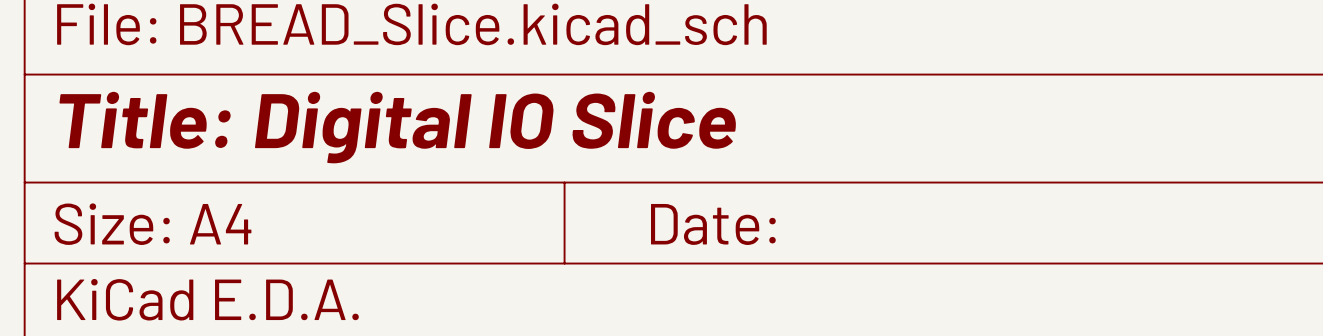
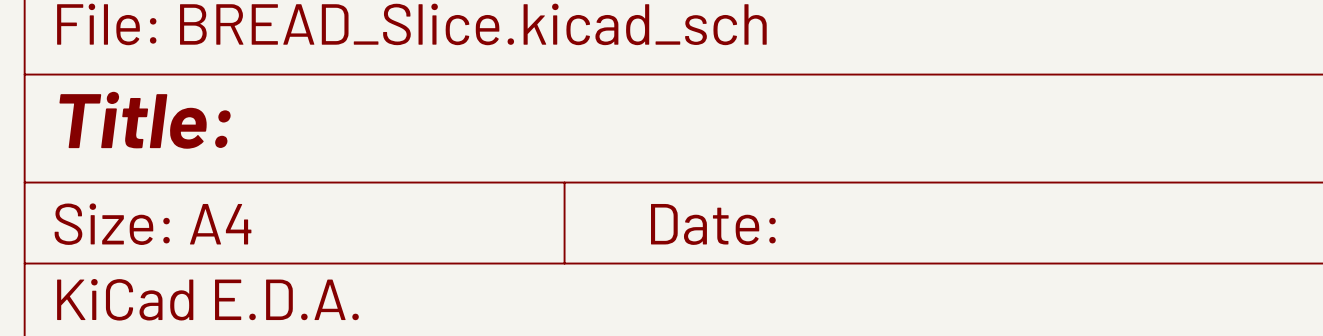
title block: Title: Digital IO Slice (397, 127) -> Title: (145, 120)

